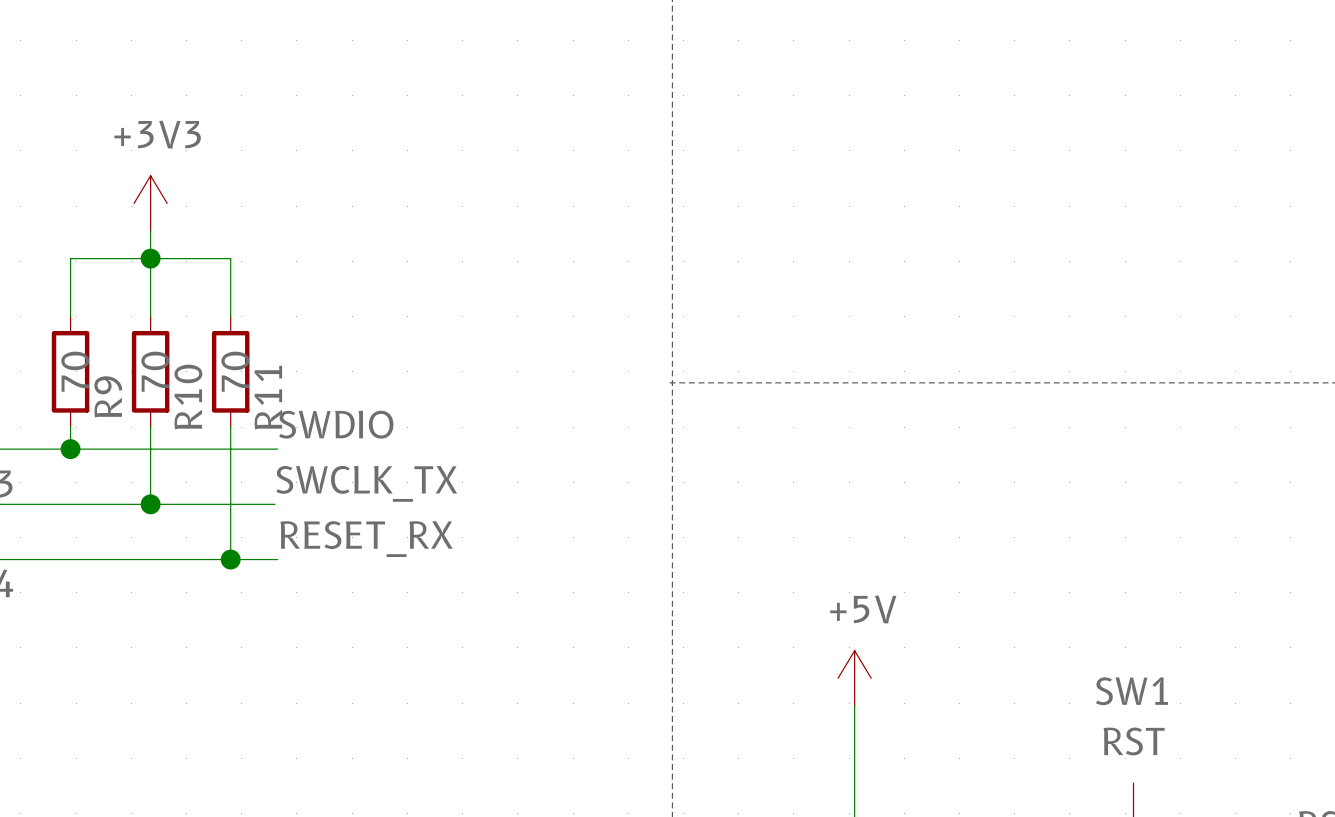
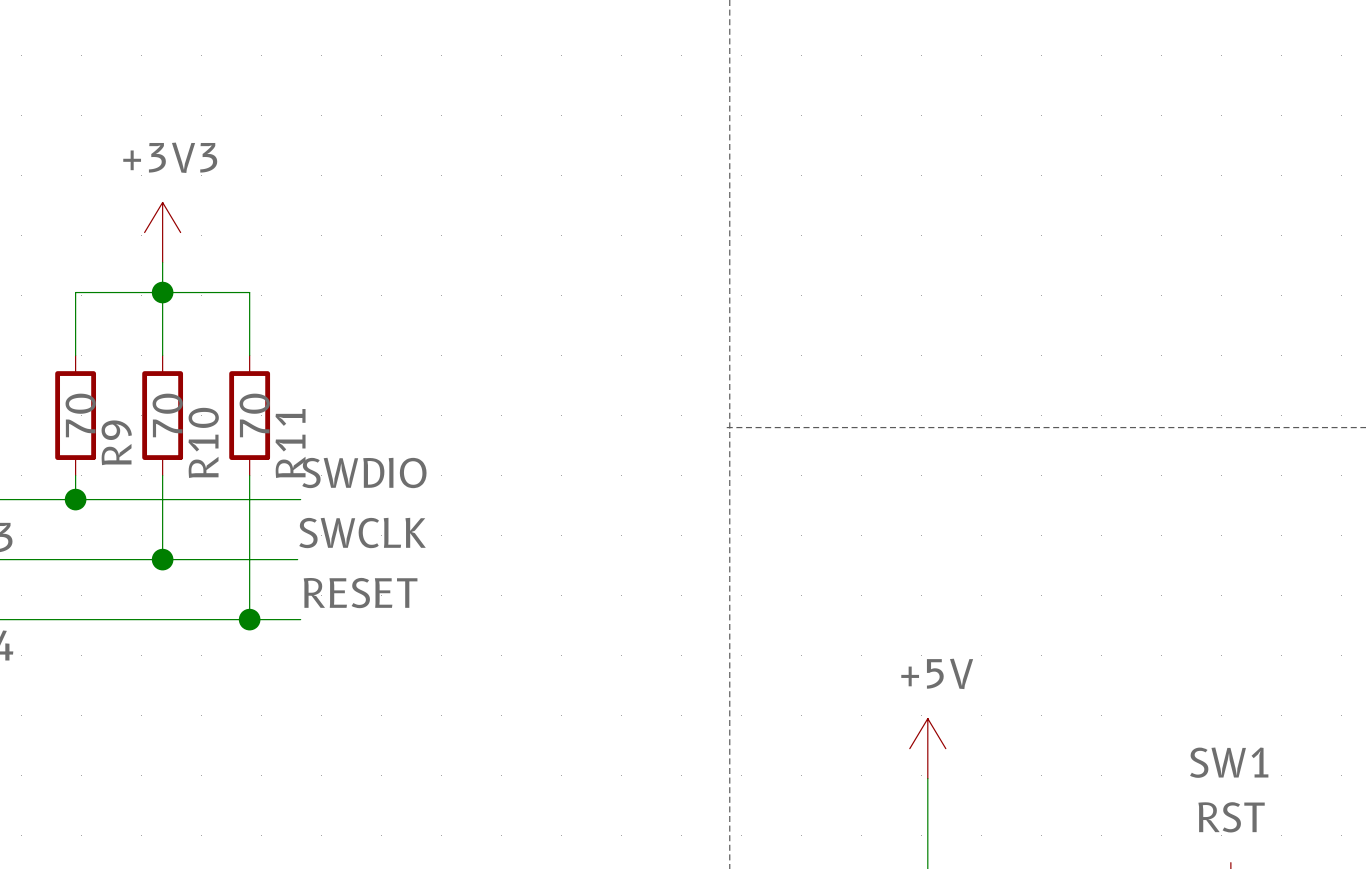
label: SWCLK_TX (366, 483) -> SWCLK (362, 532)
label: RESET_RX (366, 539) -> RESET (360, 593)

